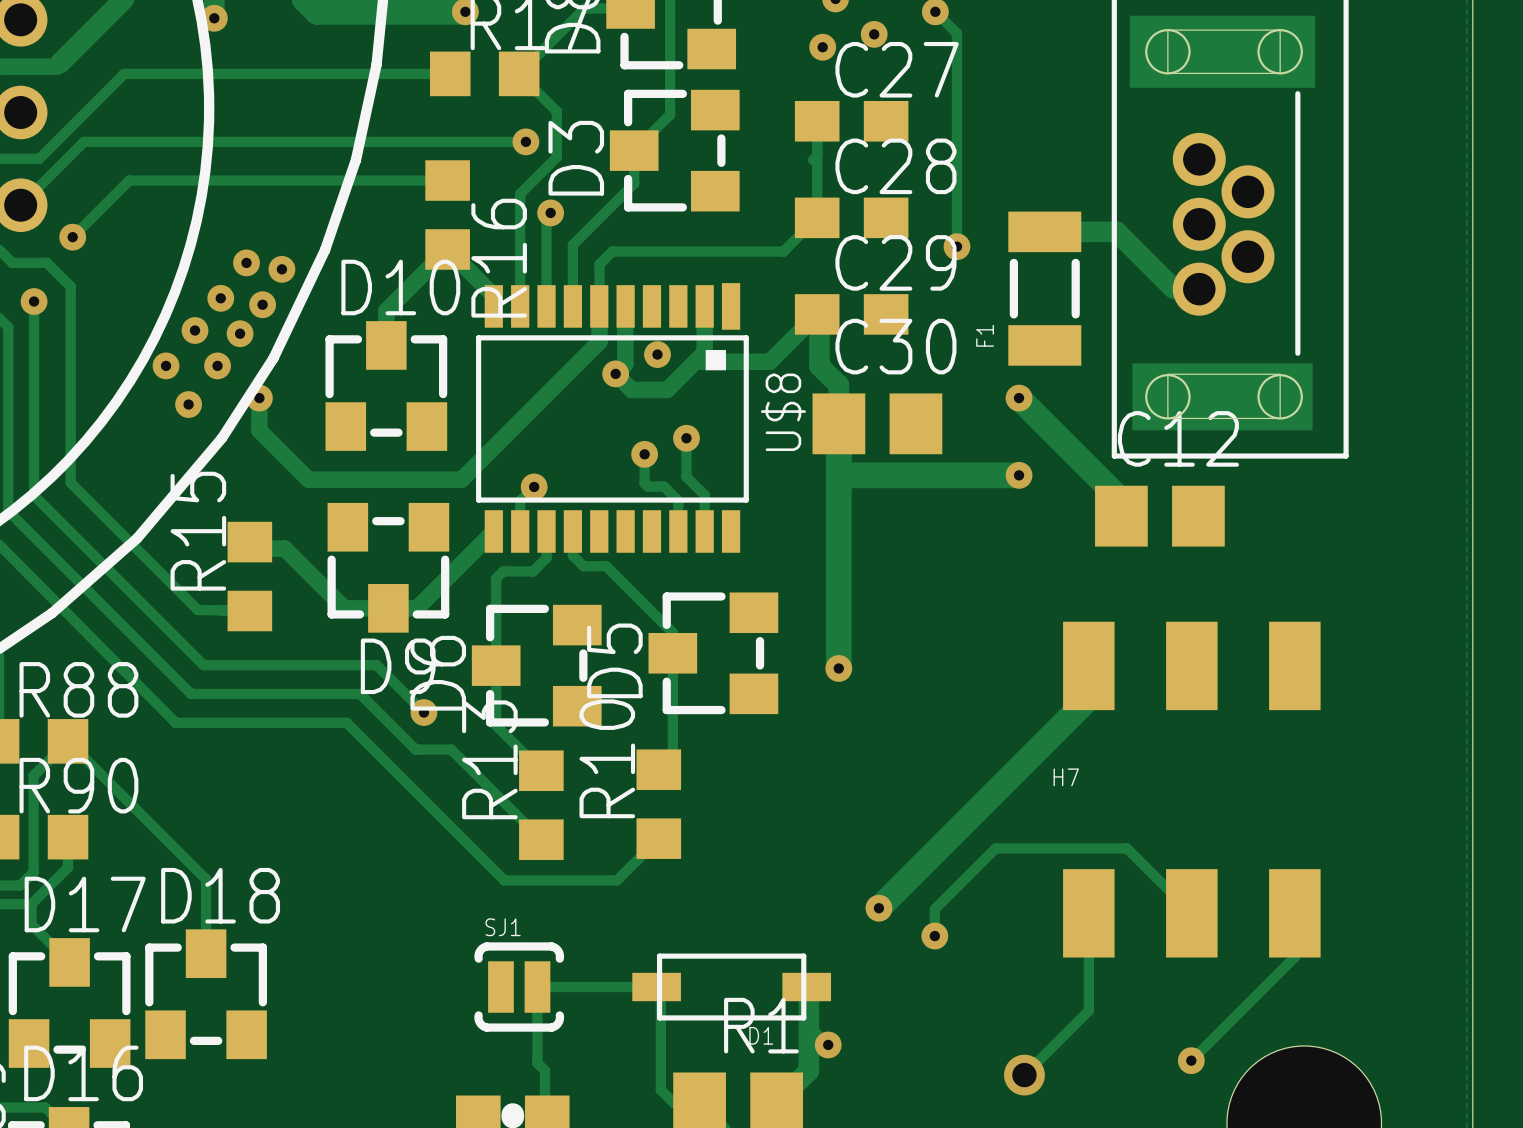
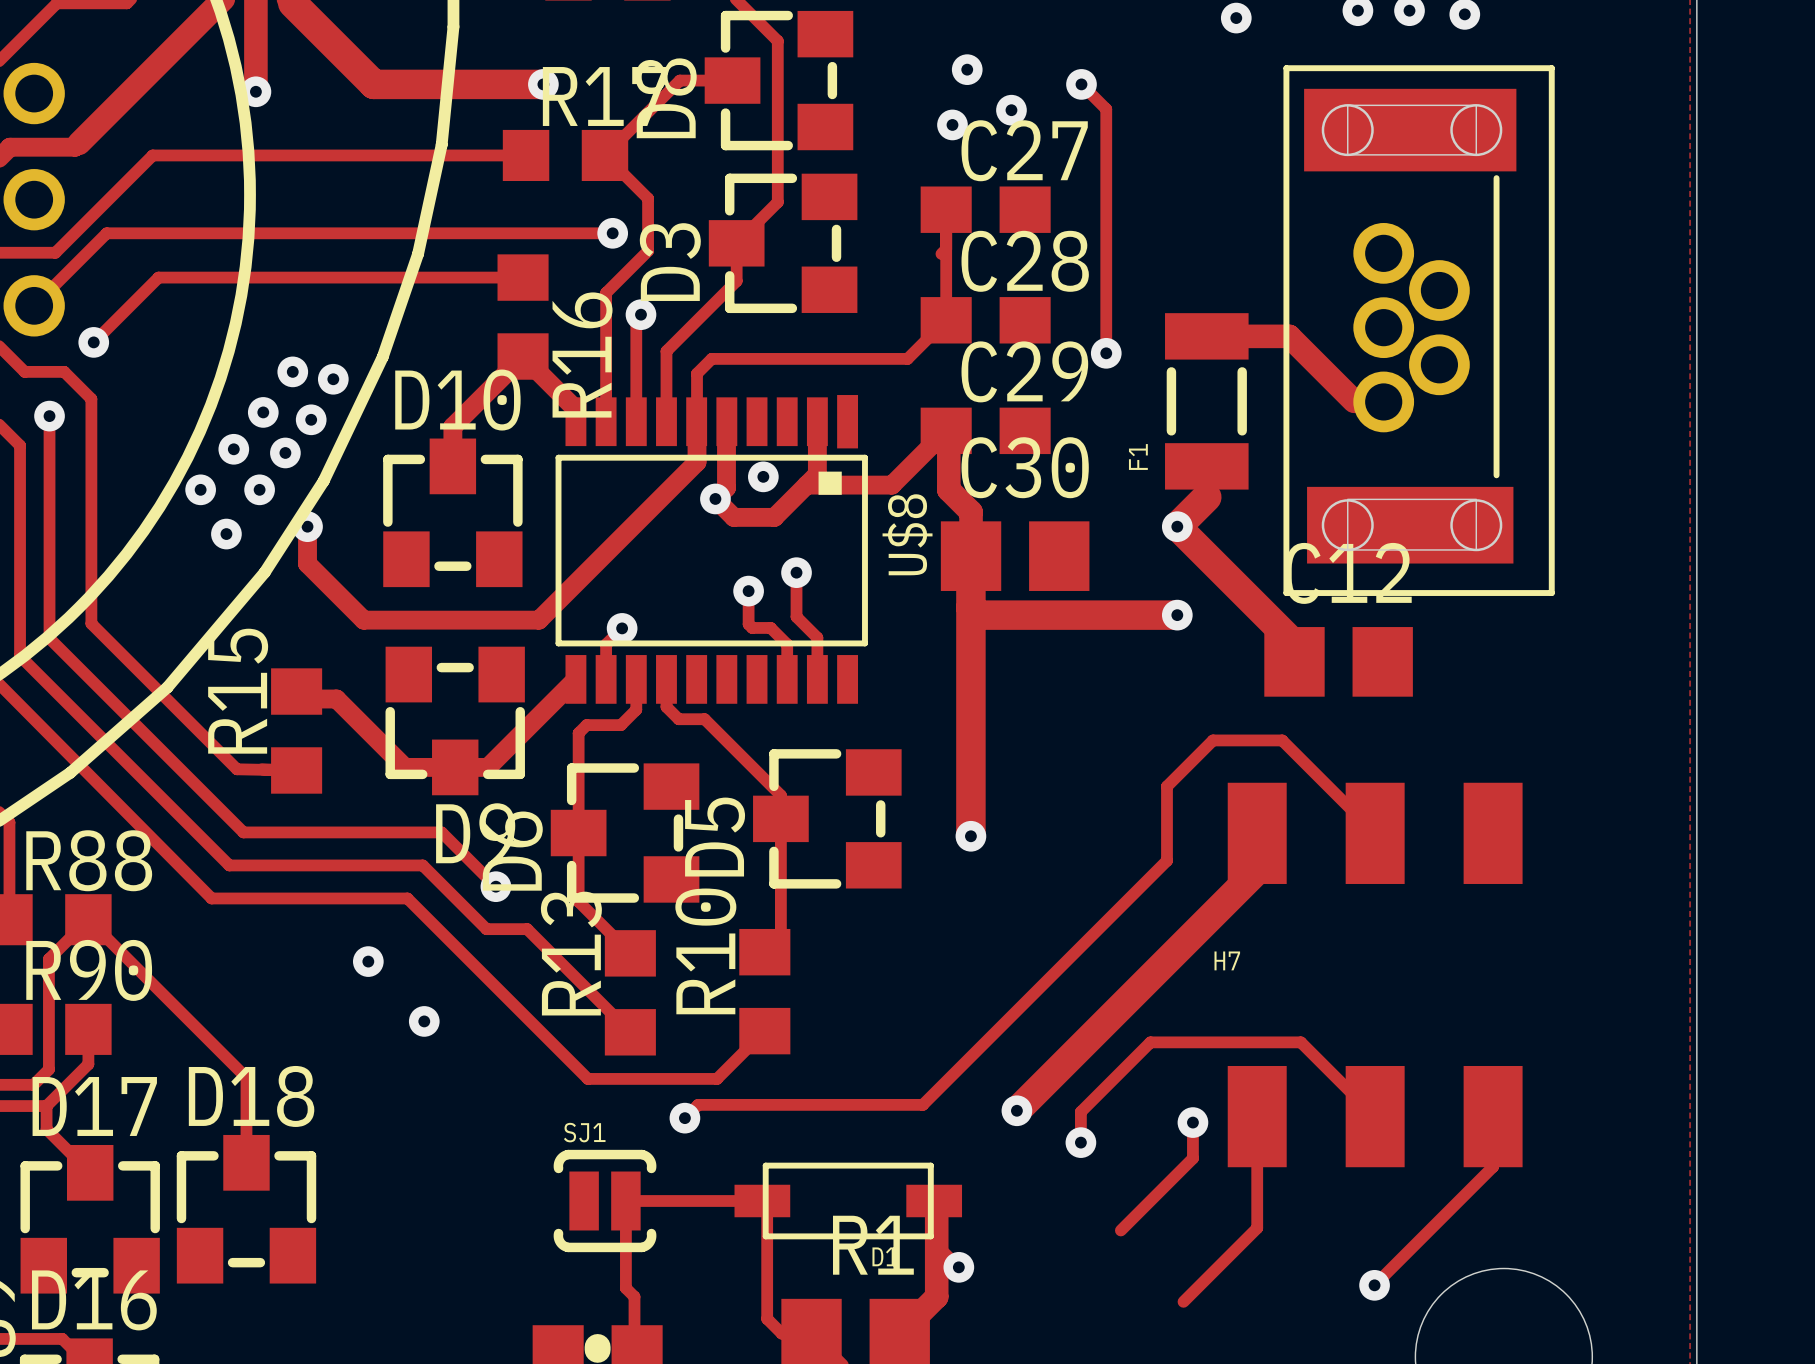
track: none -> (1206, 466) (1206, 497) (1177, 526)
track: none -> (1375, 833) (1282, 740) (1212, 740) (1166, 786) (1166, 860) (922, 1104) (698, 1104) (684, 1118)
via: none -> (368, 961)
via: none -> (424, 1021)
via: none -> (684, 1118)
track: none -> (1192, 1122) (1192, 1158) (1120, 1230)
via: none -> (1192, 1122)
via: (1024, 1075) -> none

